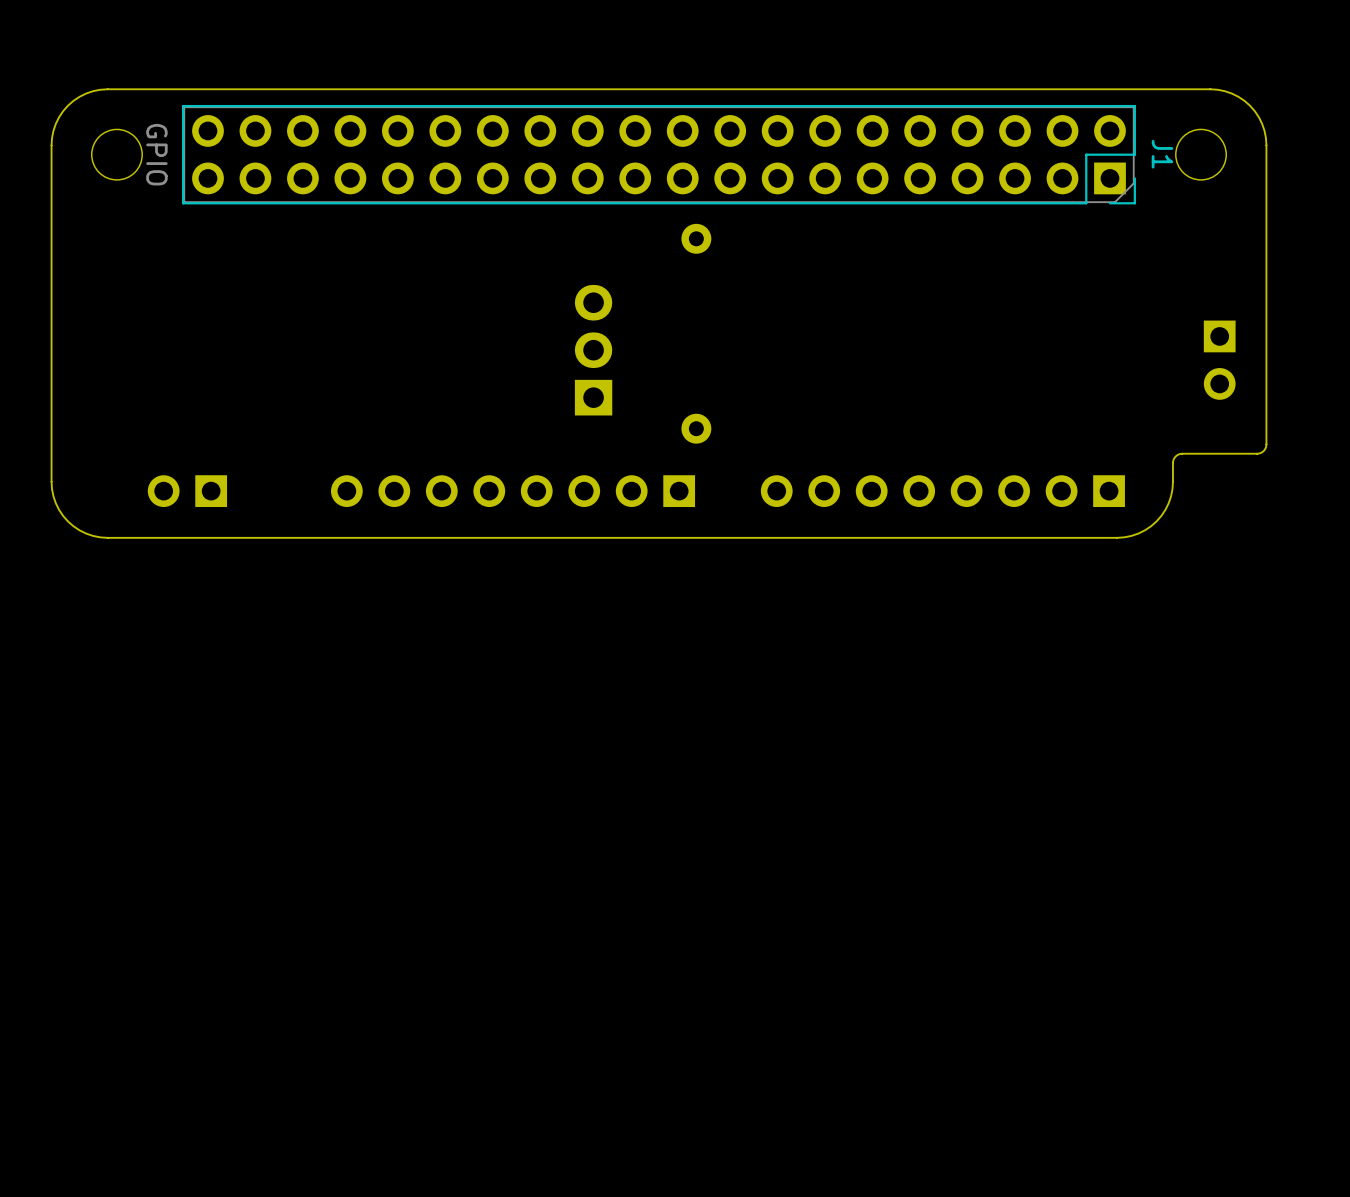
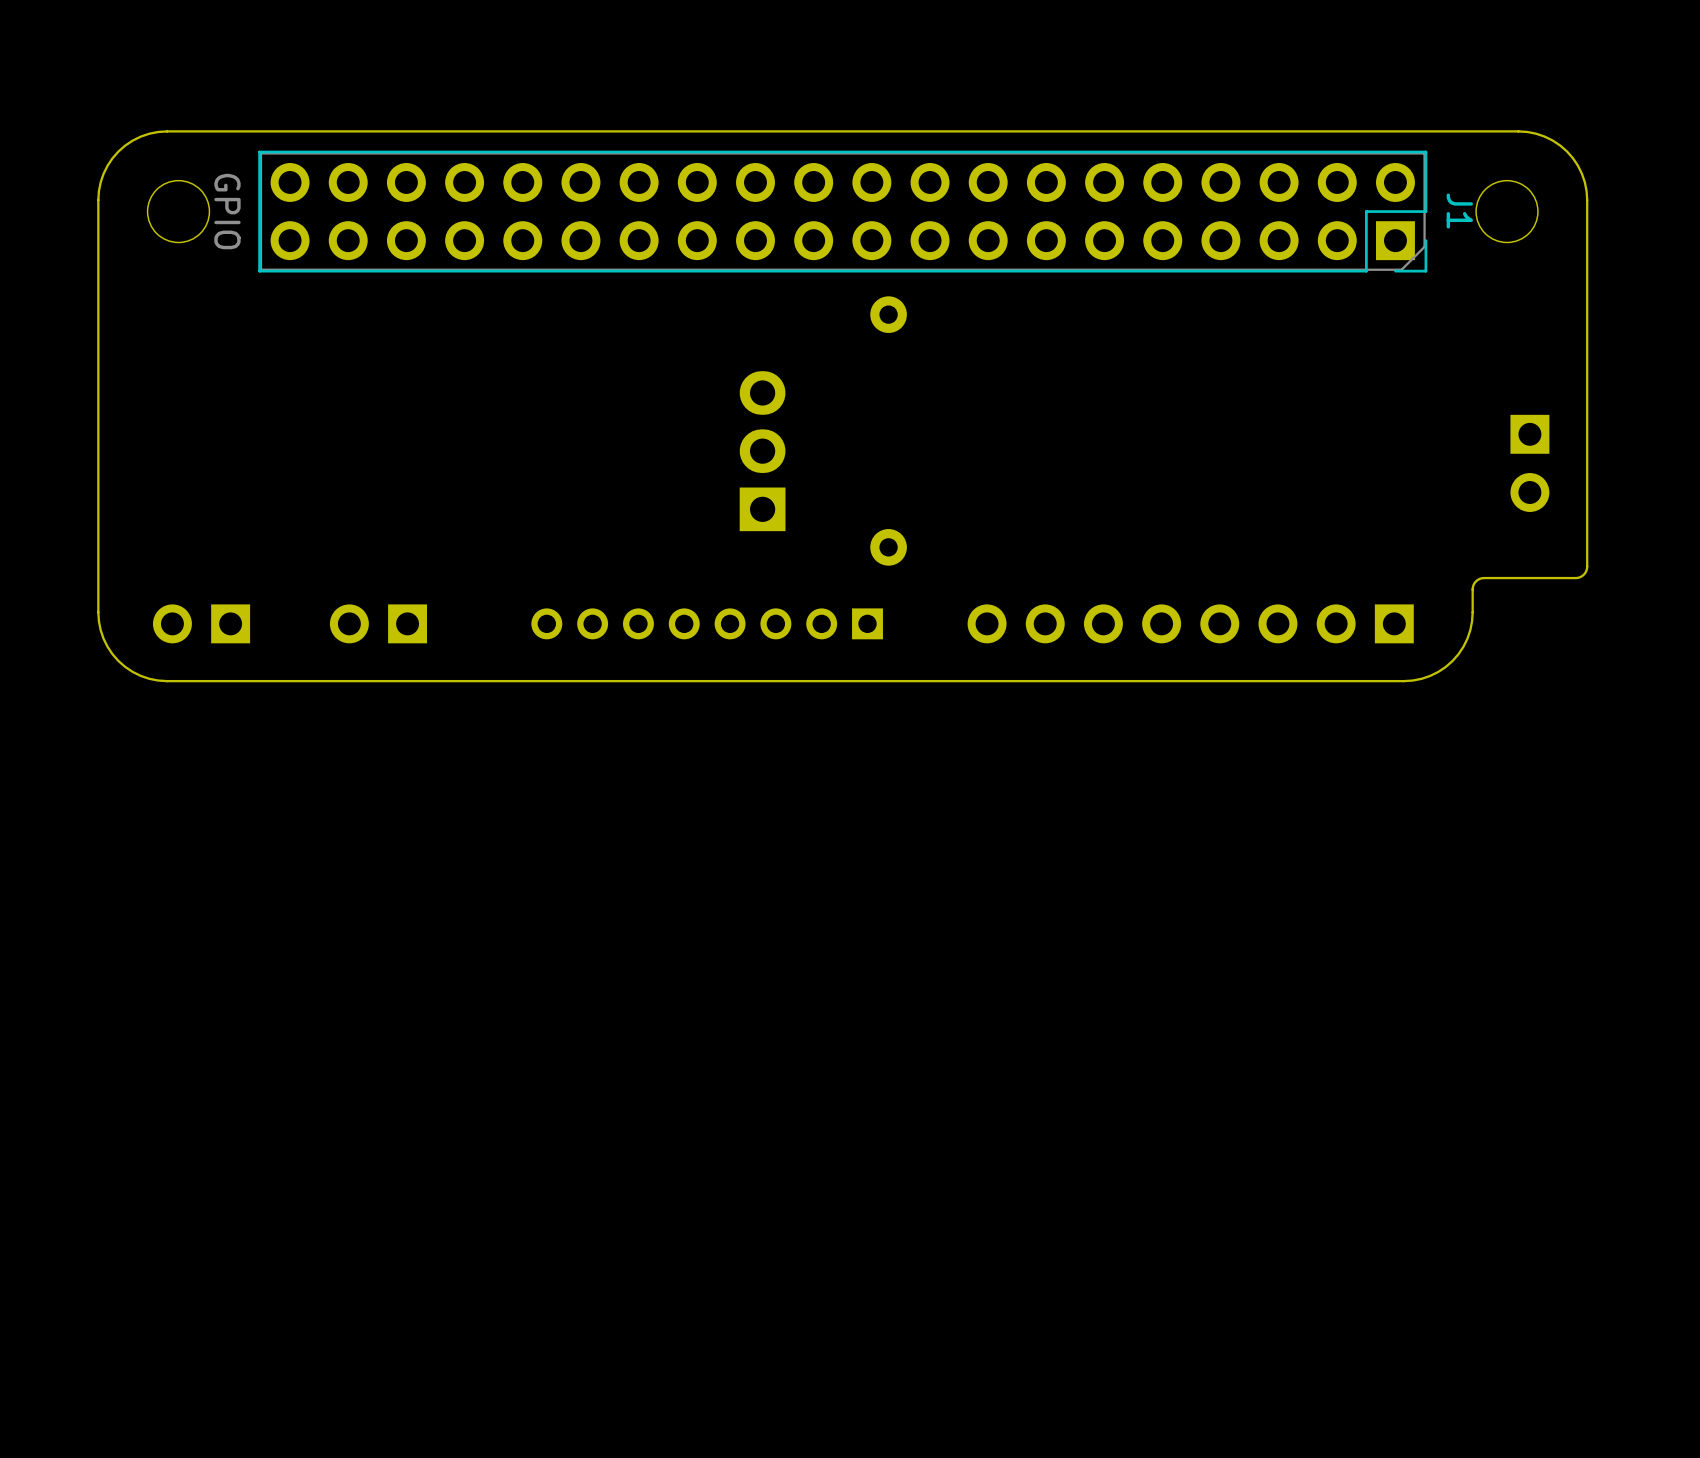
part: none -> (201, 623)
part: (187, 491) -> none
part: none -> (378, 623)
part: (513, 491) -> none
part: none -> (707, 623)

